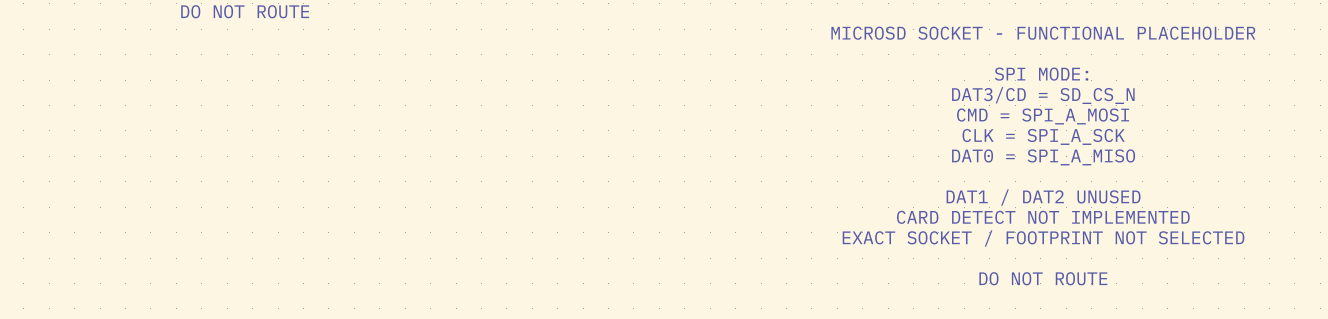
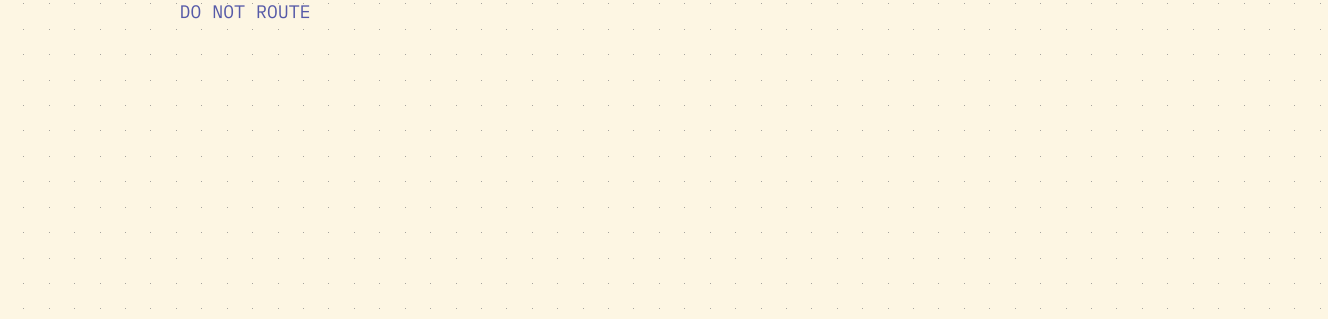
text: MICROSD SOCKET - FUNCTIONAL PLACEHOLDER (1043, 33) -> none
text: SPI MODE: (1041, 74) -> none
text: DAT3/CD = SD_CS_N (1043, 95) -> none
text: CMD = SPI_A_MOSI (1043, 116) -> none
text: CLK = SPI_A_SCK (1043, 136) -> none
text: DAT0 = SPI_A_MISO (1043, 157) -> none
text: DAT1 / DAT2 UNUSED (1043, 197) -> none
text: CARD DETECT NOT IMPLEMENTED (1043, 217) -> none
text: EXACT SOCKET / FOOTPRINT NOT SELECTED (1043, 238) -> none
text: DO NOT ROUTE (1043, 278) -> none

